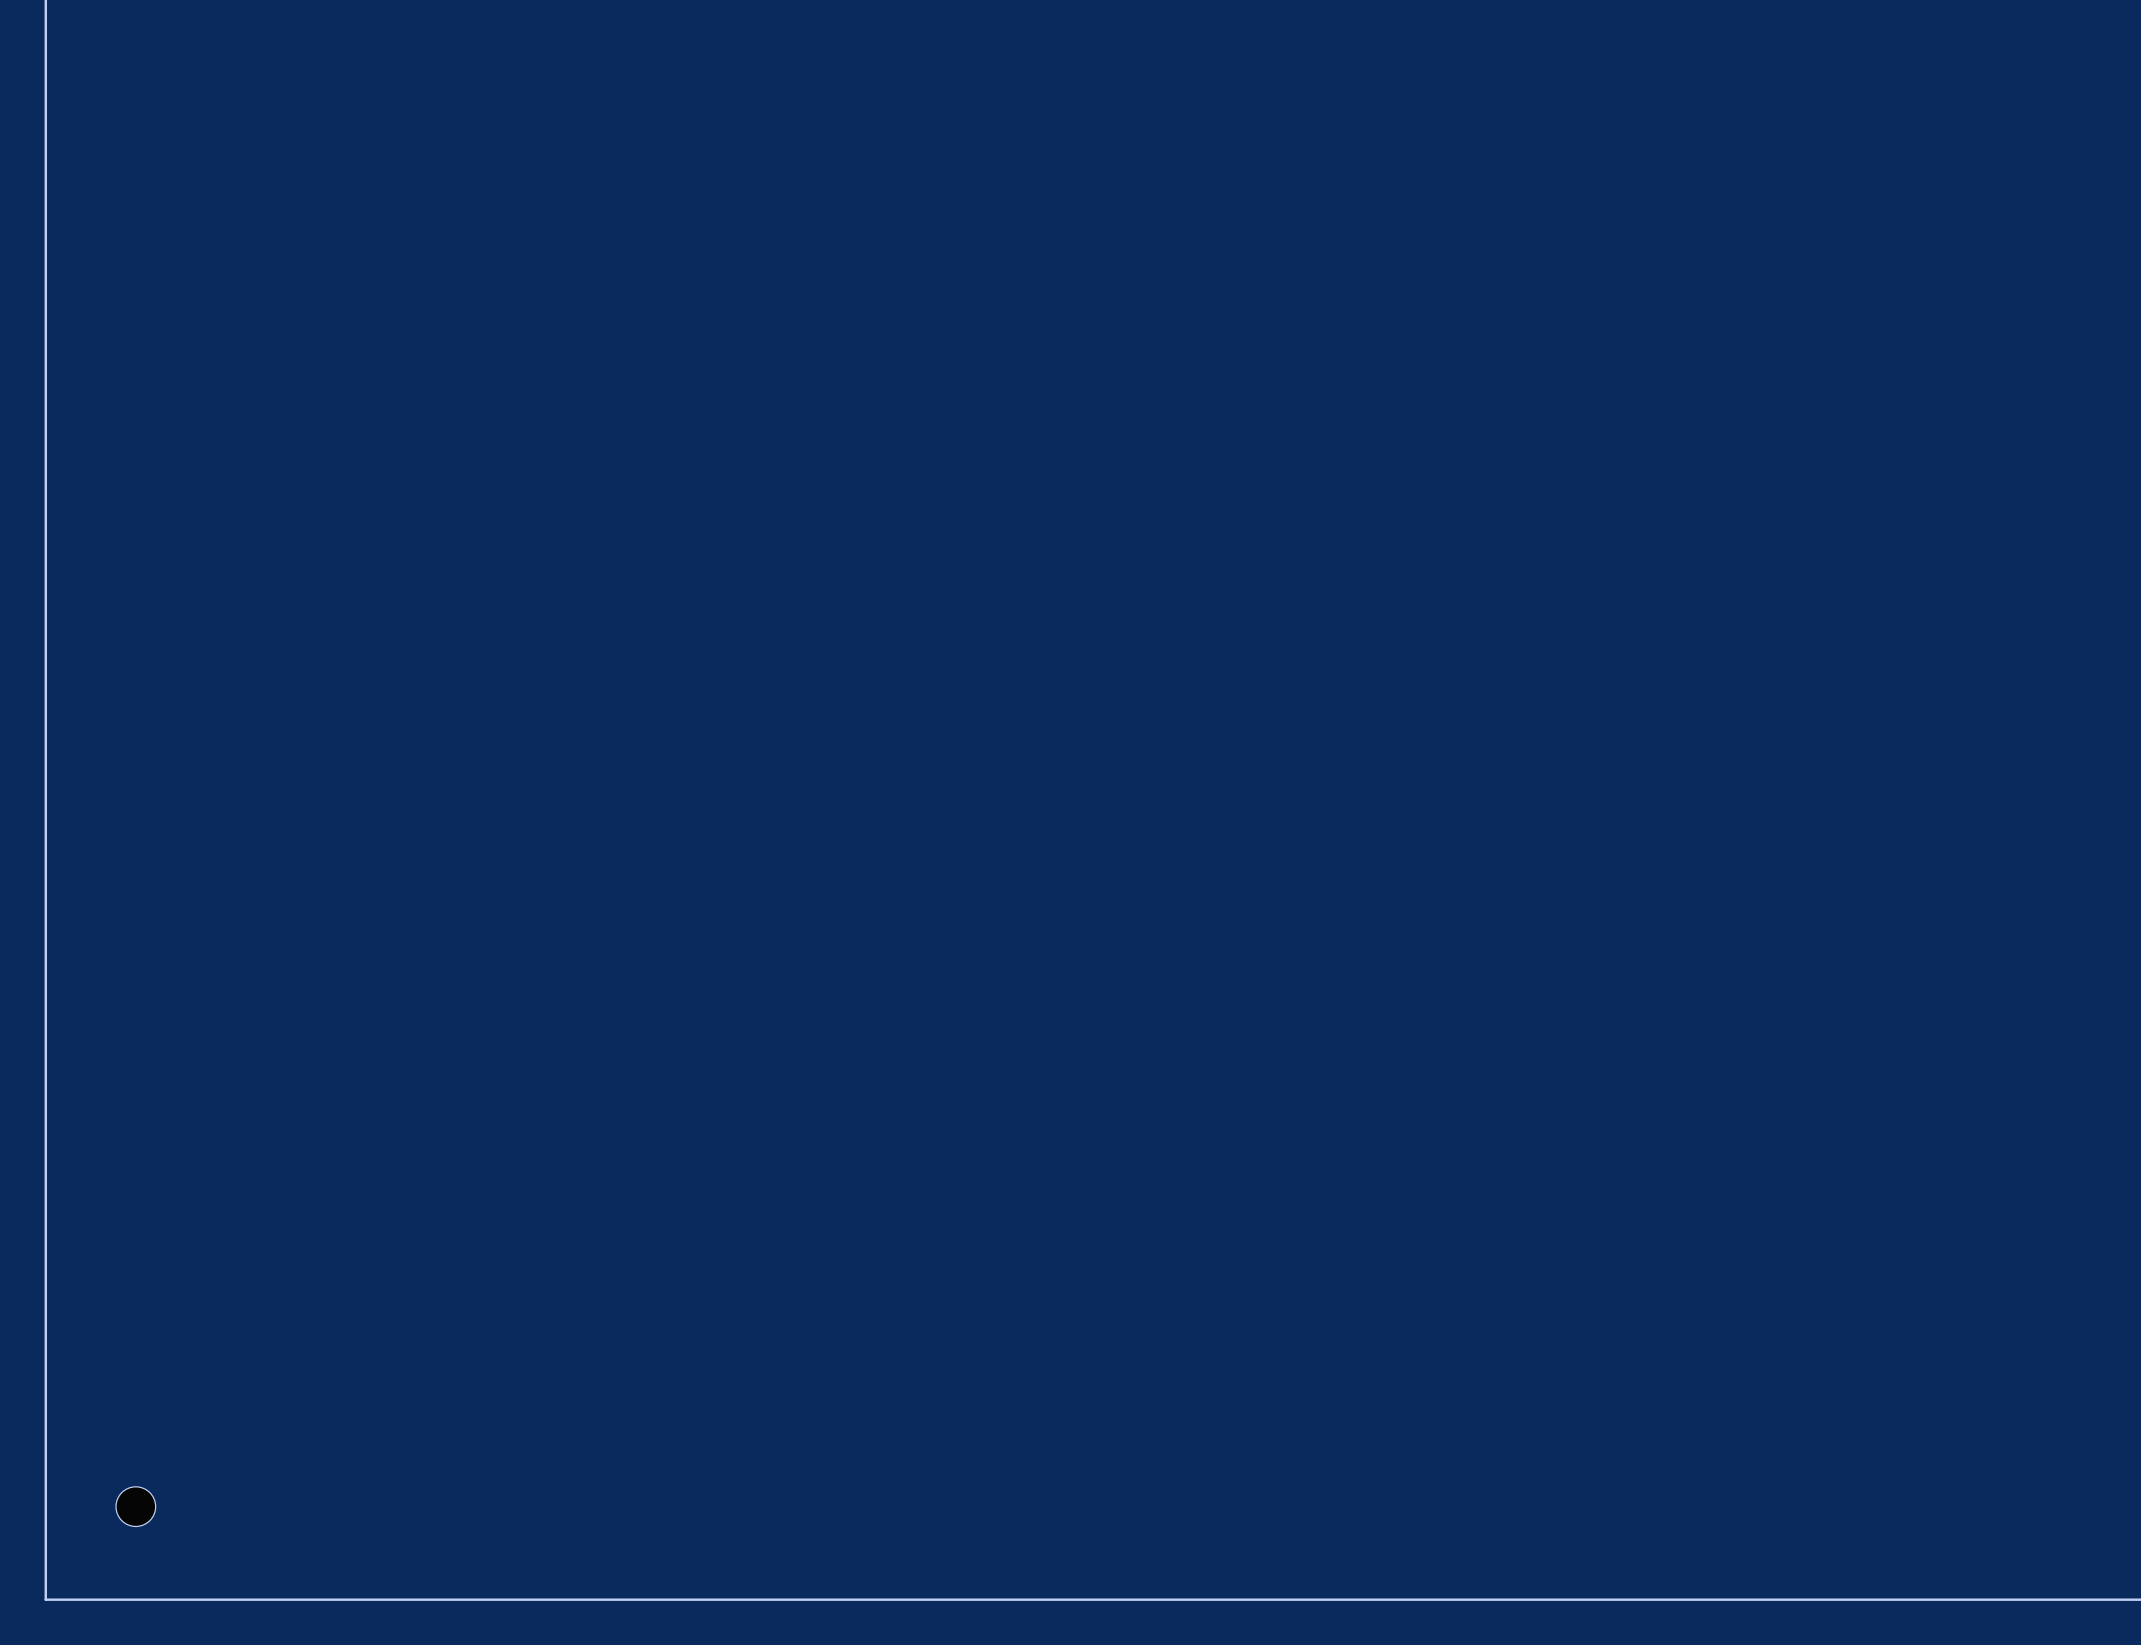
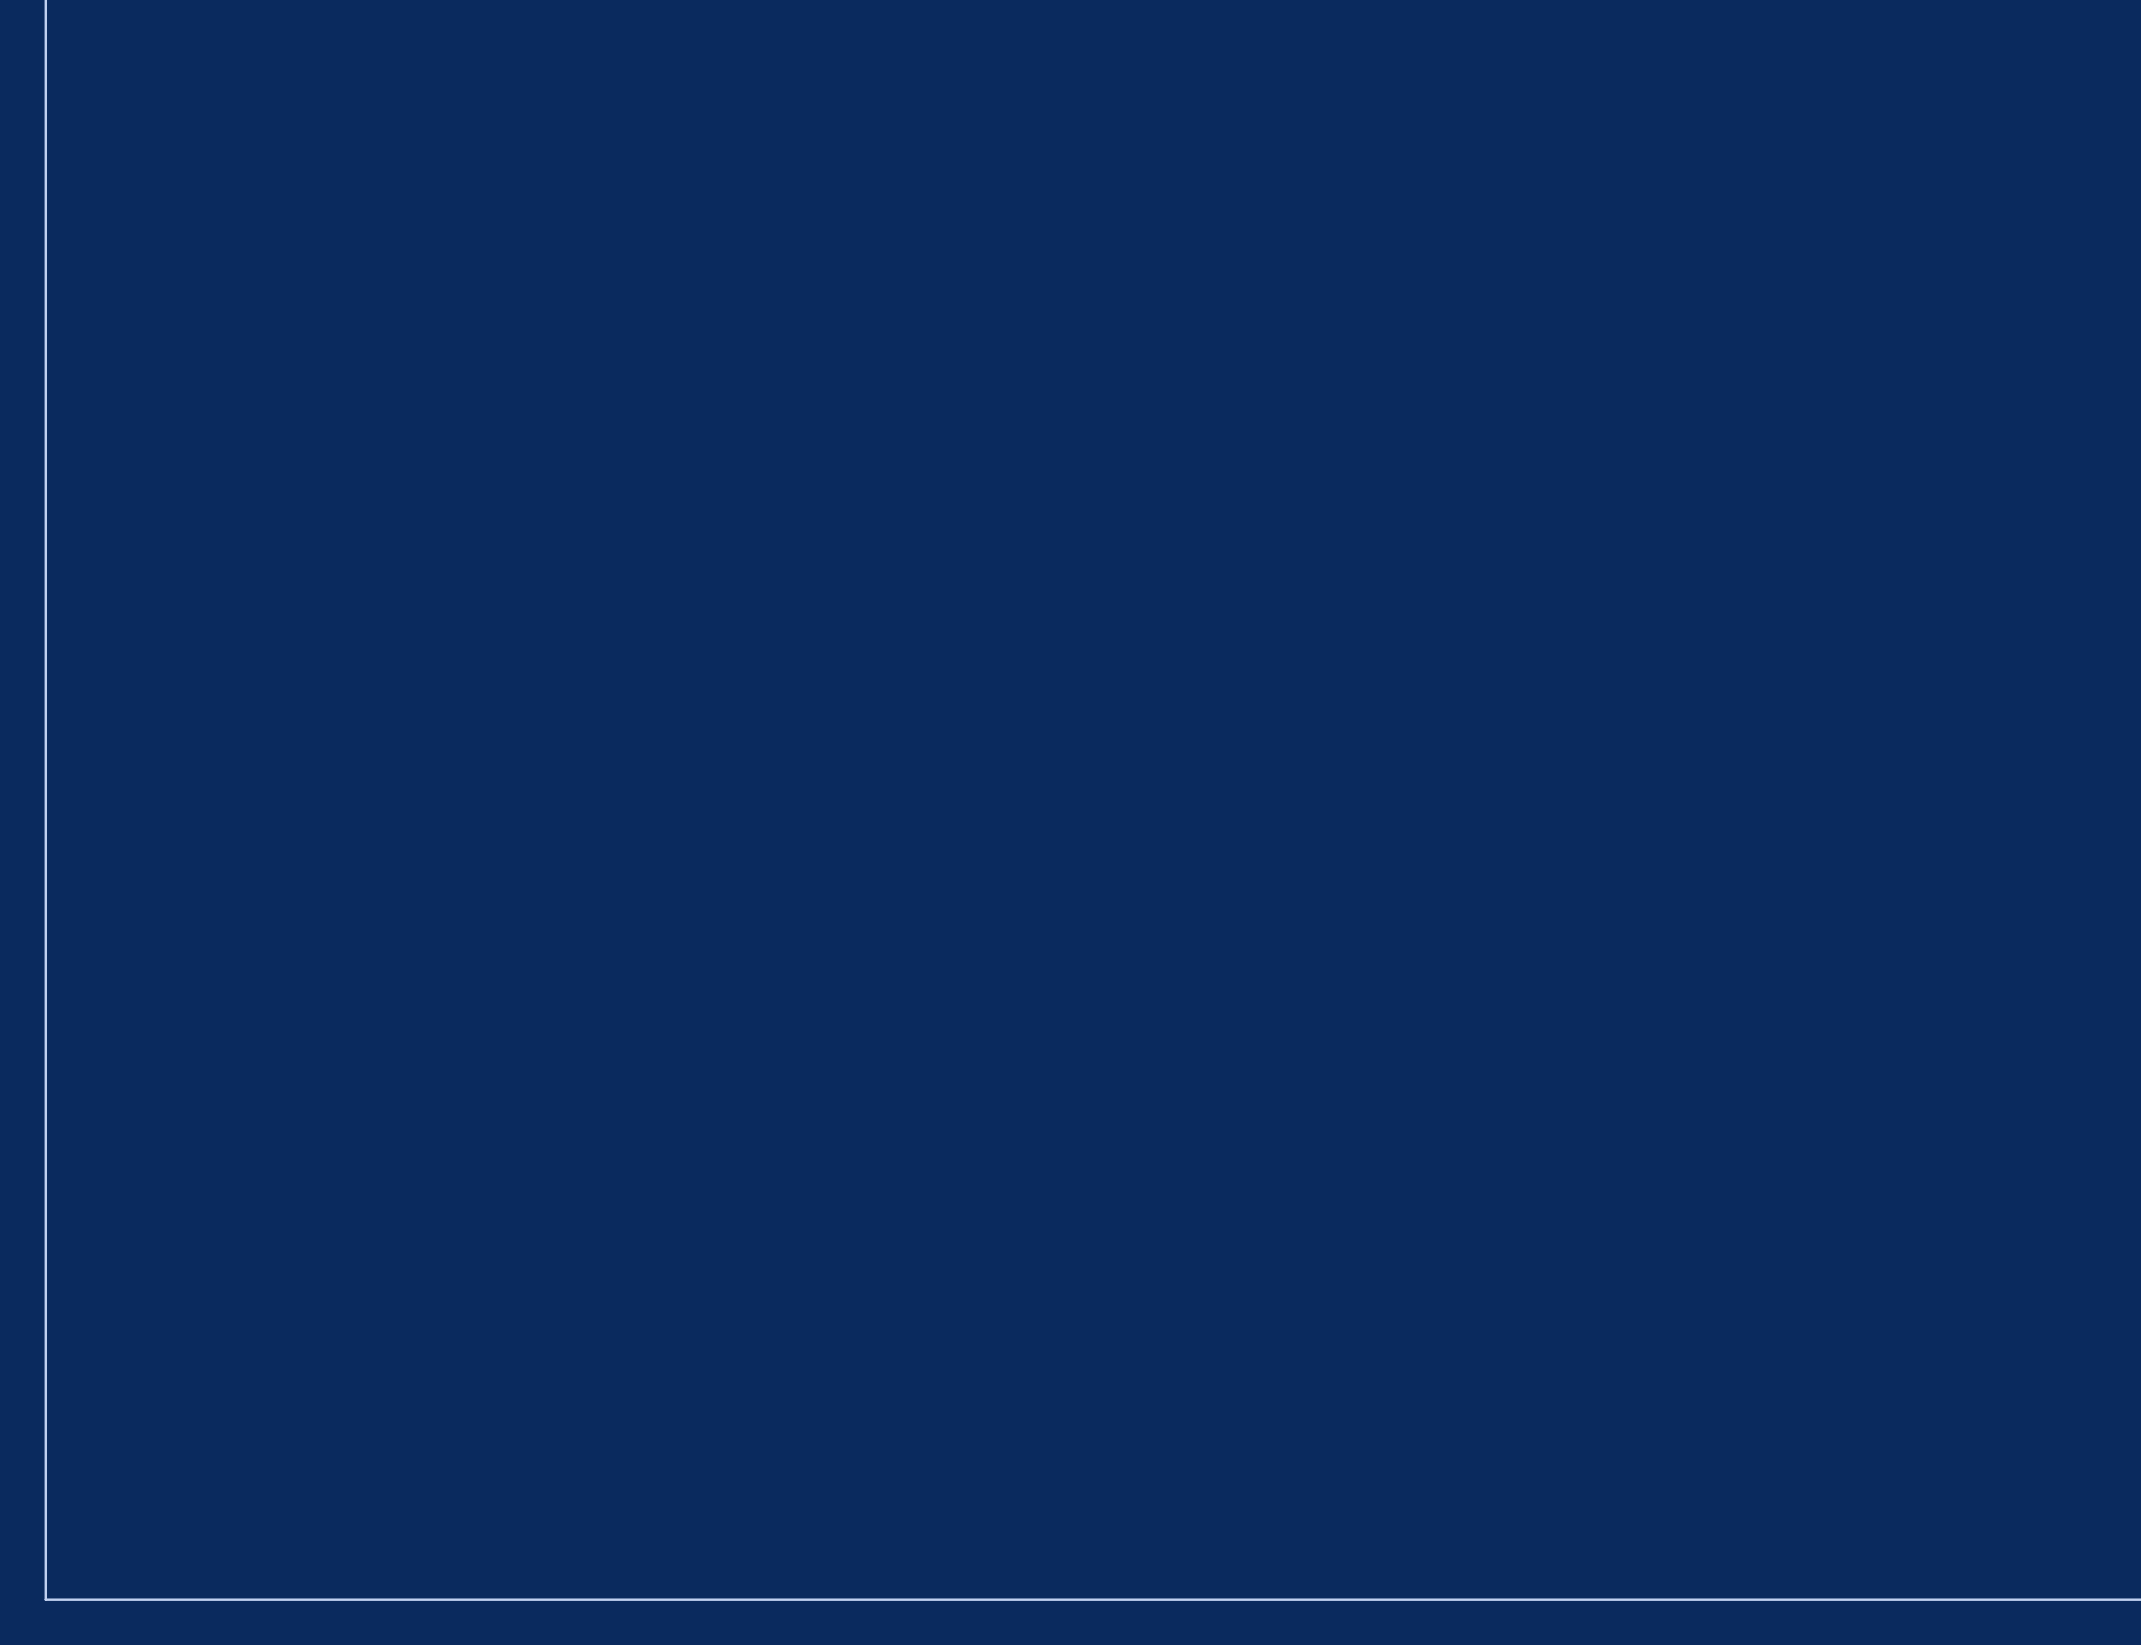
part: (135, 1506) -> none

